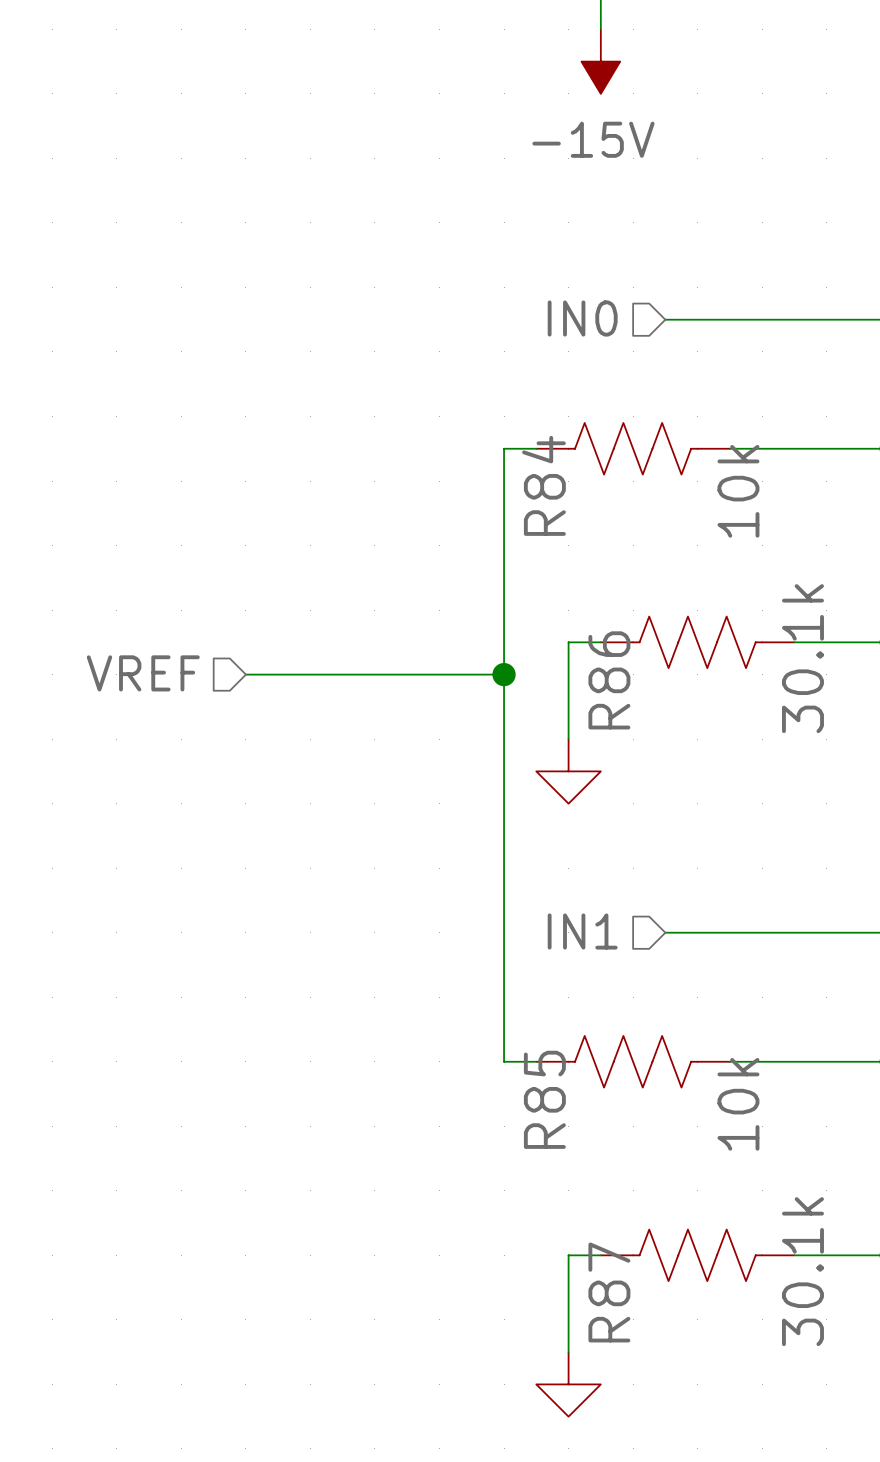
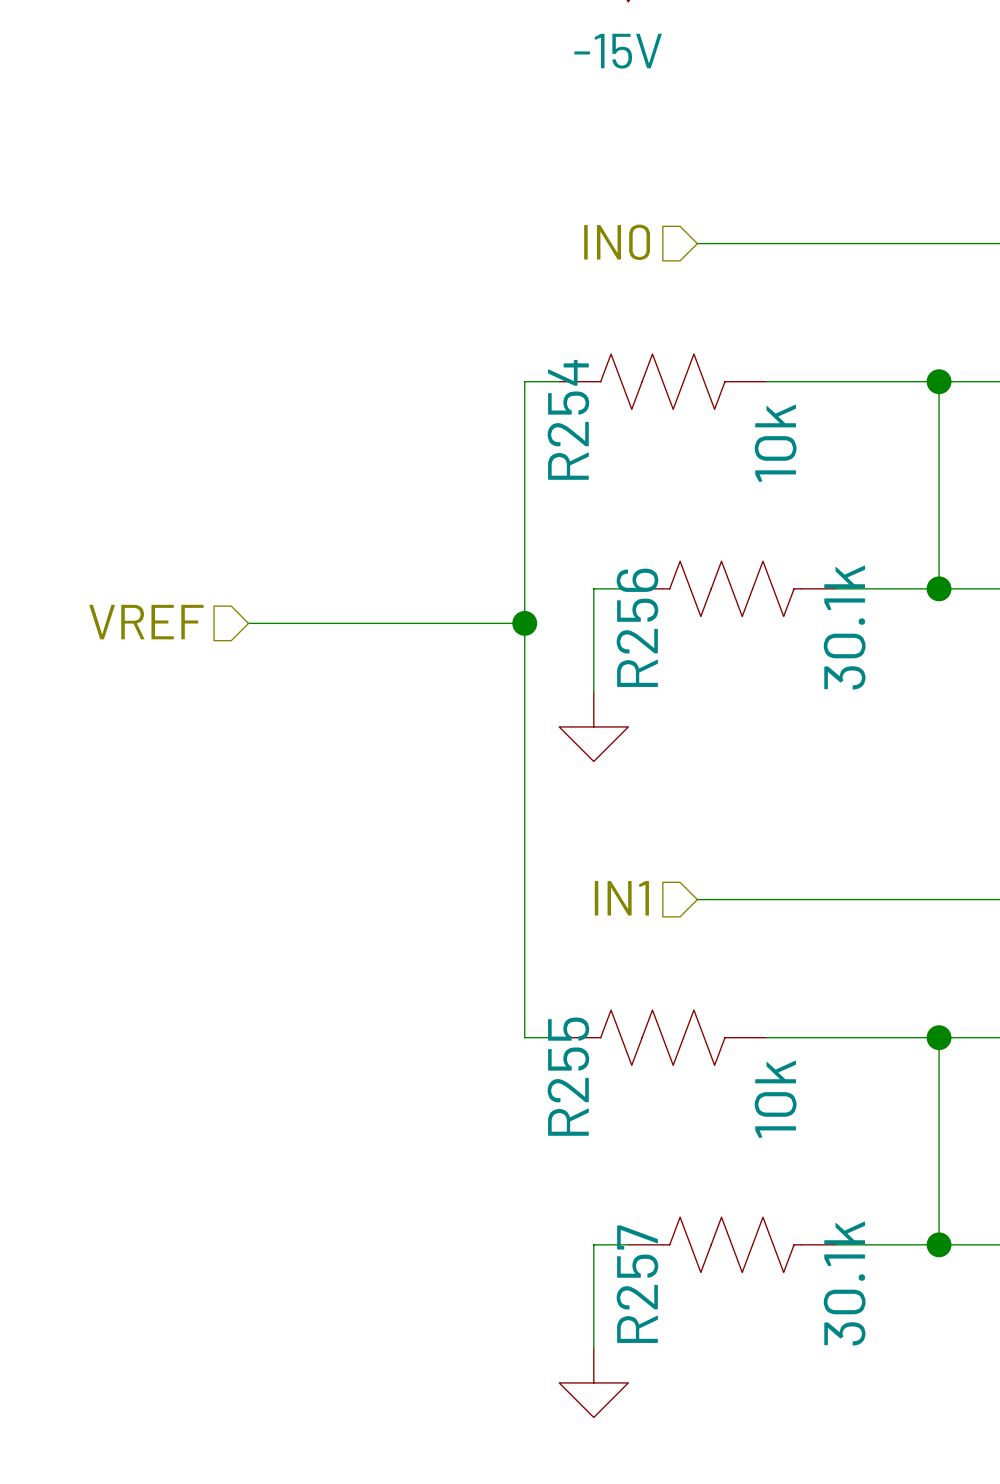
R84 name: R84 (543, 485) -> R254 (568, 419)
R86 name: R86 (609, 680) -> R256 (637, 627)
R85 name: R85 (544, 1099) -> R255 (568, 1076)
R87 name: R87 (609, 1292) -> R257 (637, 1284)

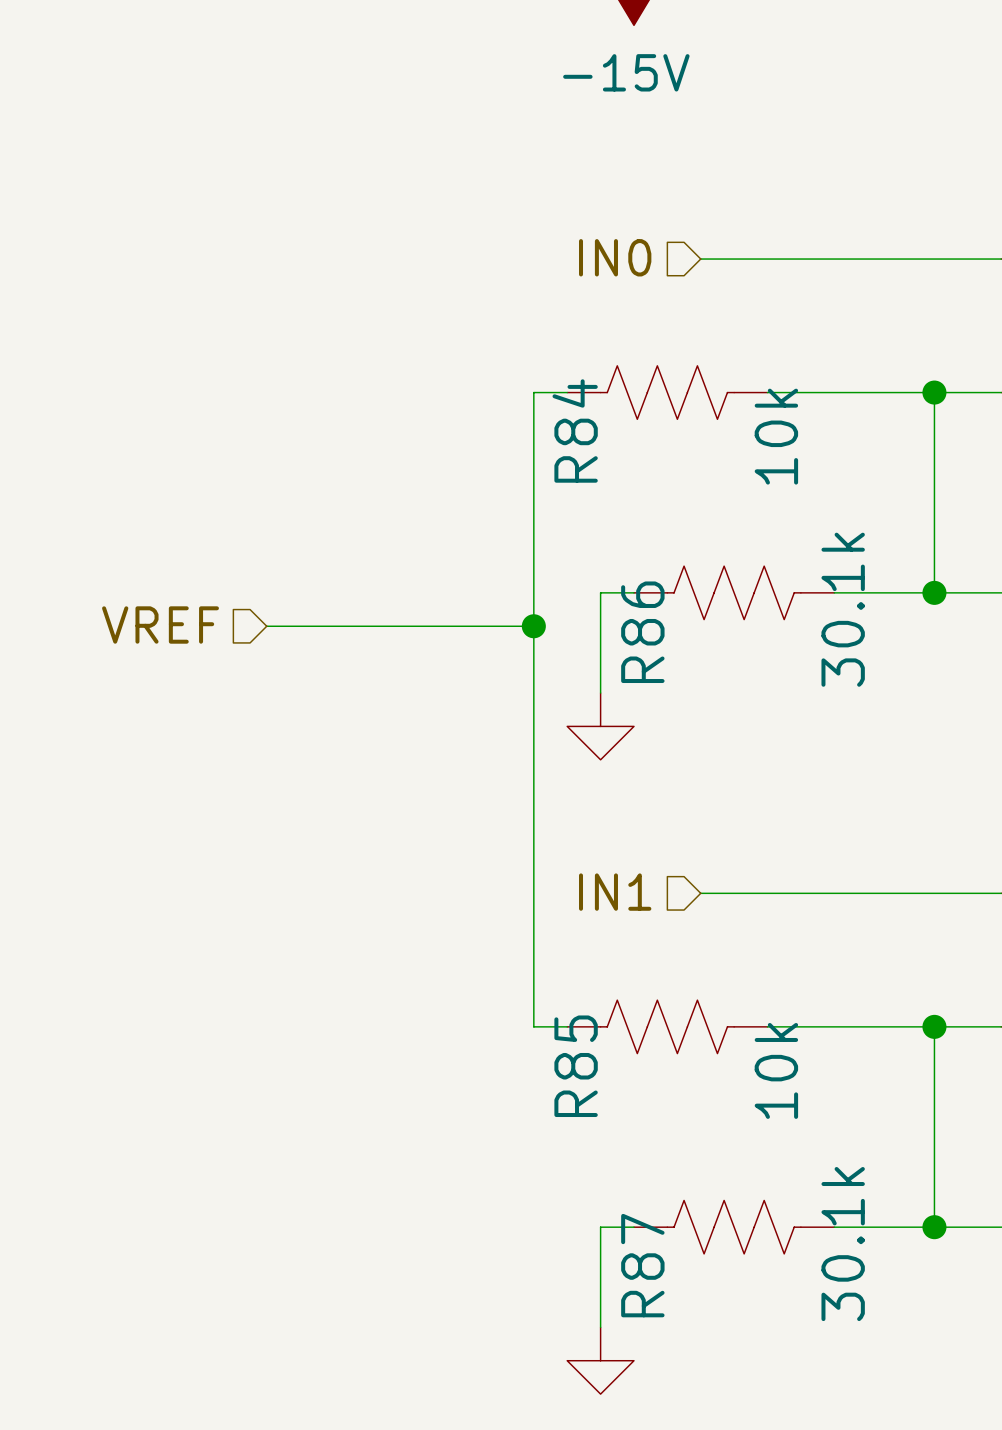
R254 name: R254 (568, 419) -> R84 (575, 430)
R256 name: R256 (637, 627) -> R86 (642, 632)
R255 name: R255 (568, 1076) -> R85 (576, 1066)
R257 name: R257 (637, 1284) -> R87 (642, 1265)

